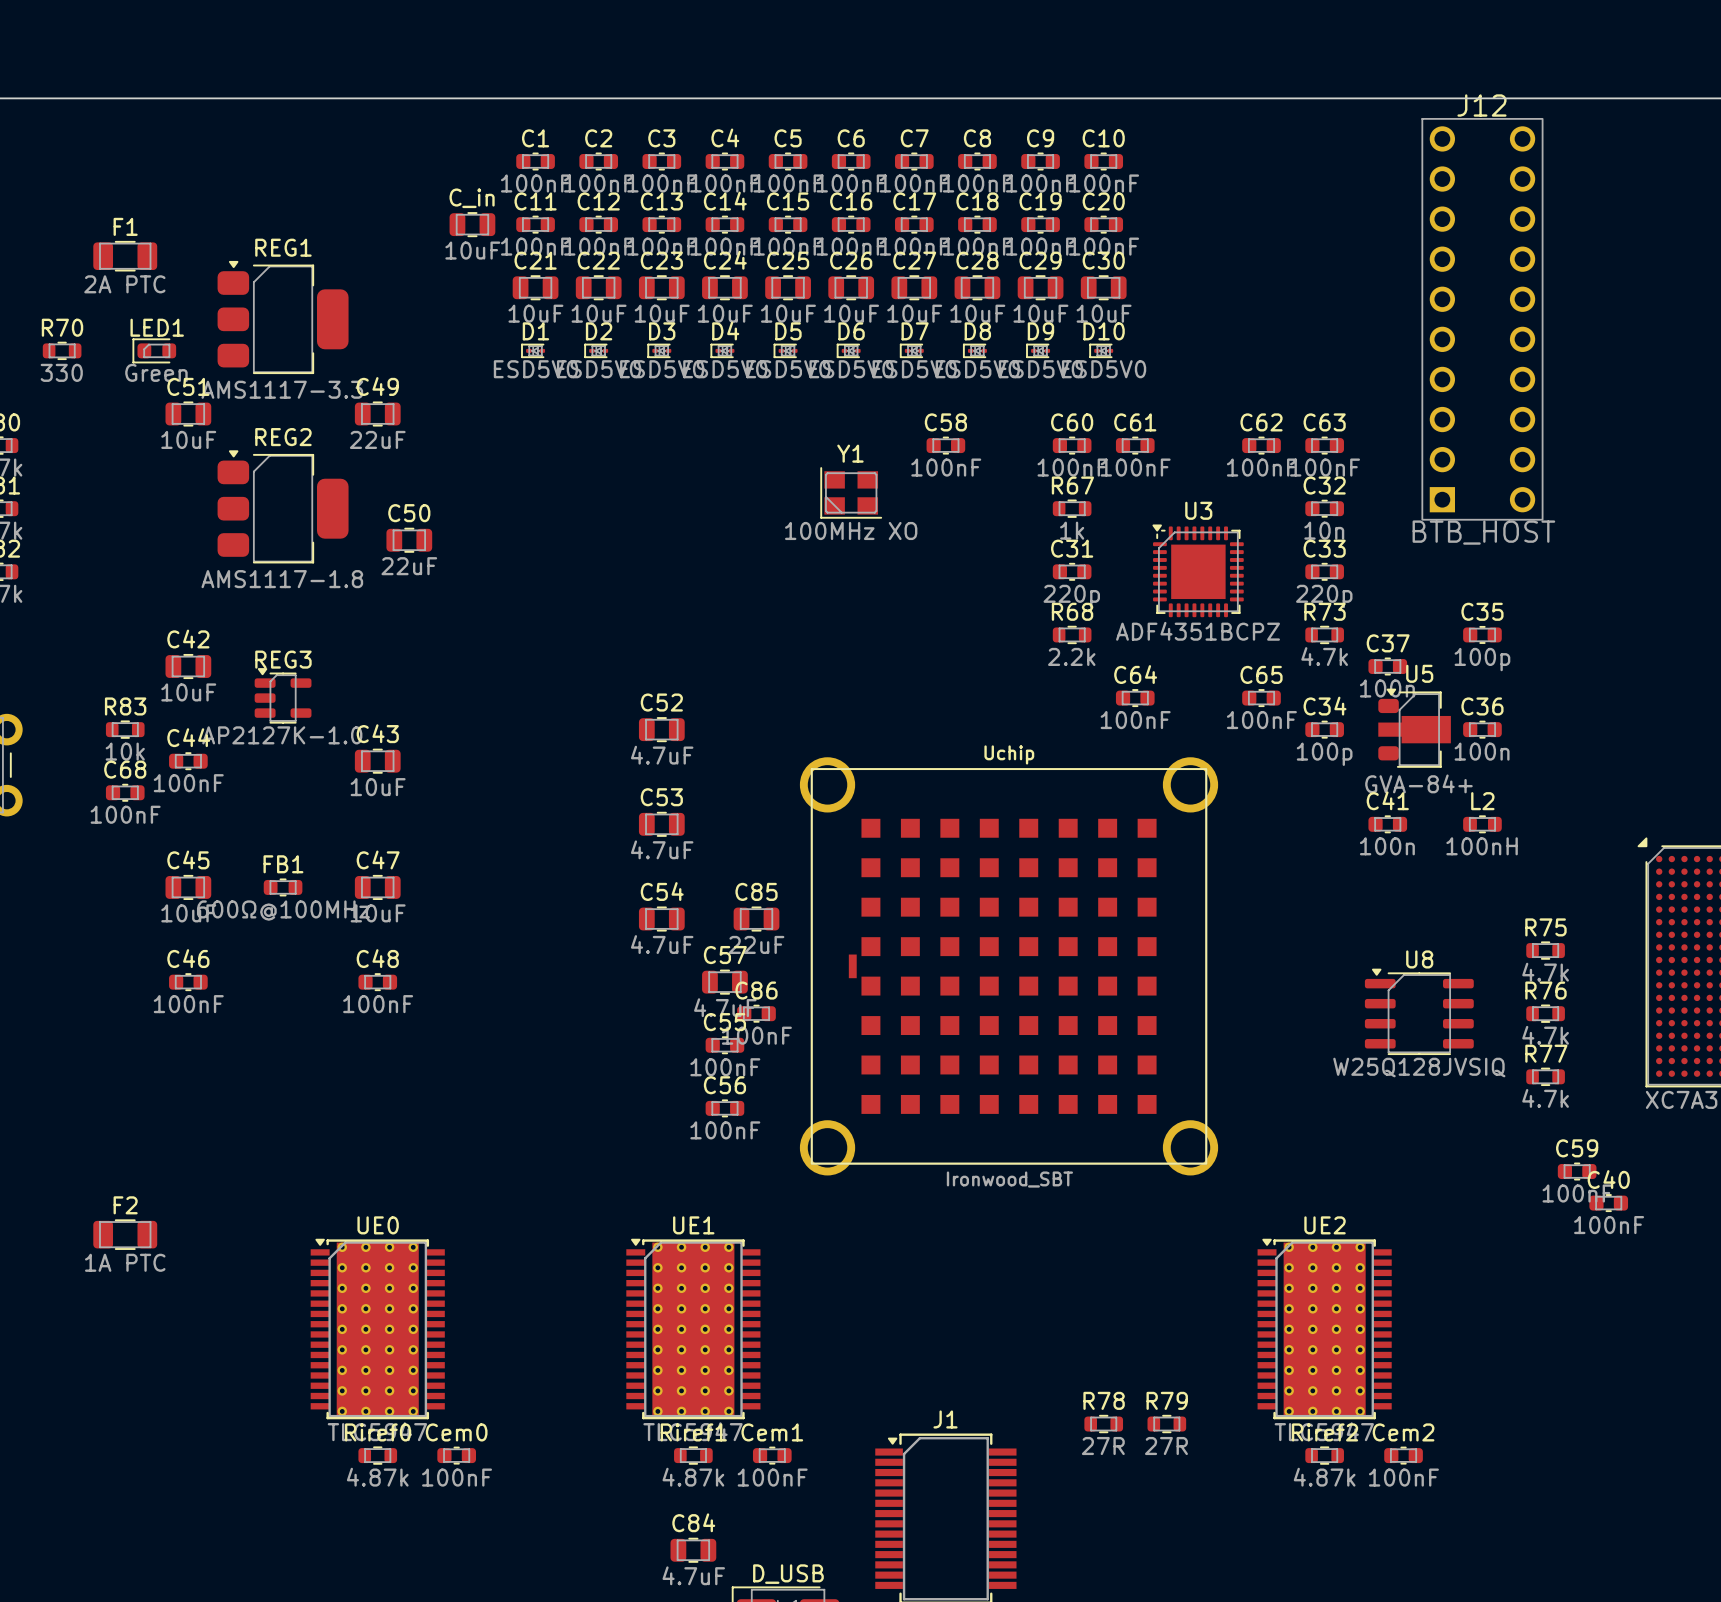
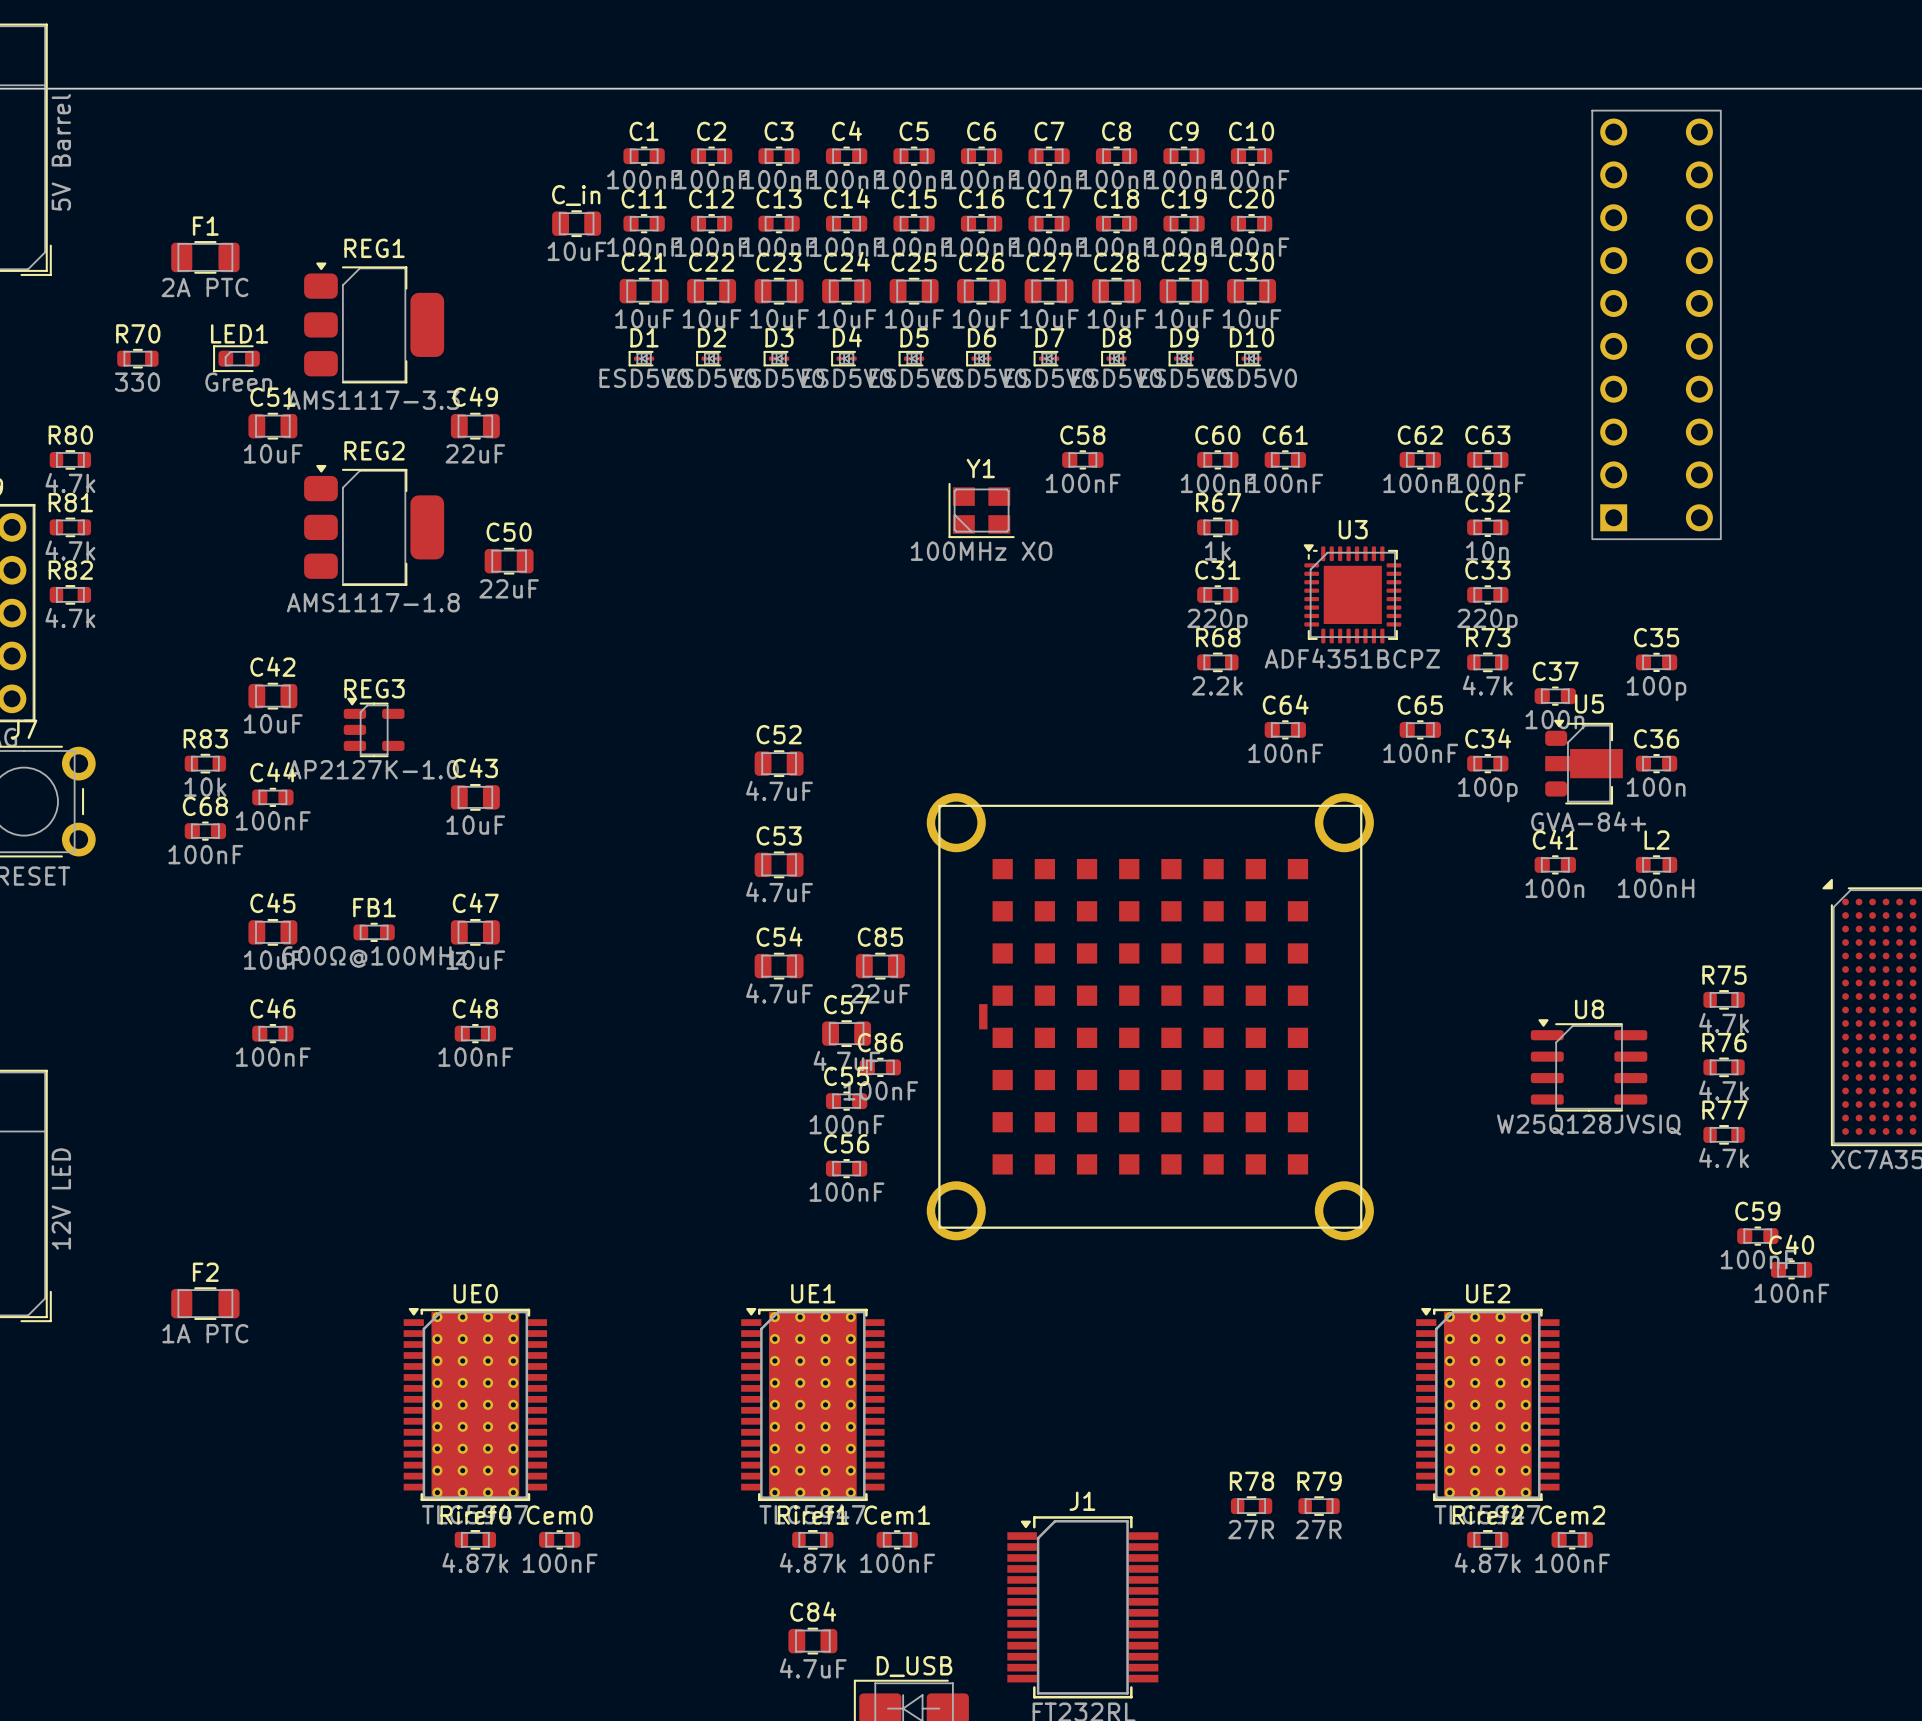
J12 name: J12 (1481, 105) -> none
J12 value: BTB_HOST (1483, 532) -> none
Uchip name: Uchip (1009, 754) -> none
Uchip value: Ironwood_SBT (1009, 1179) -> none

